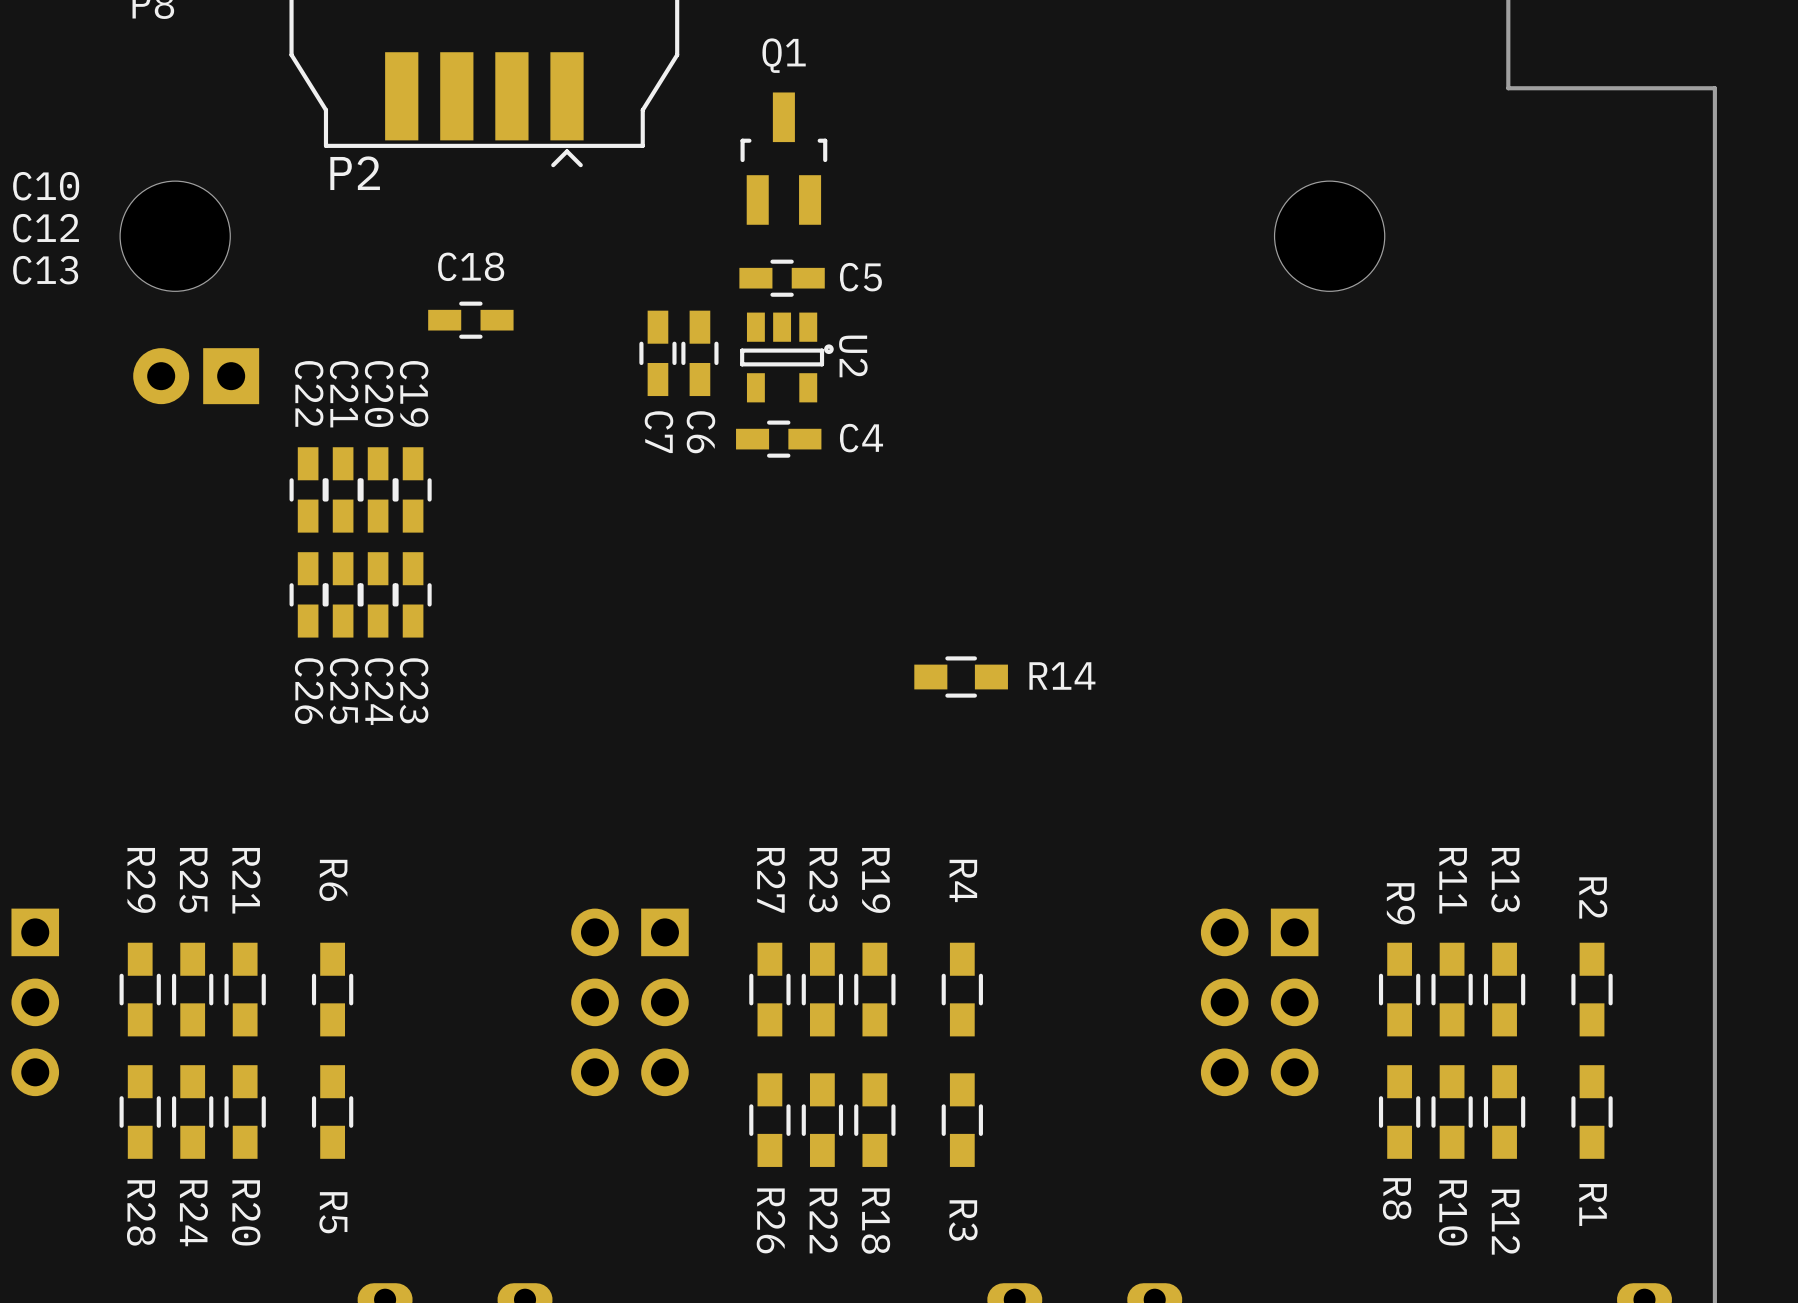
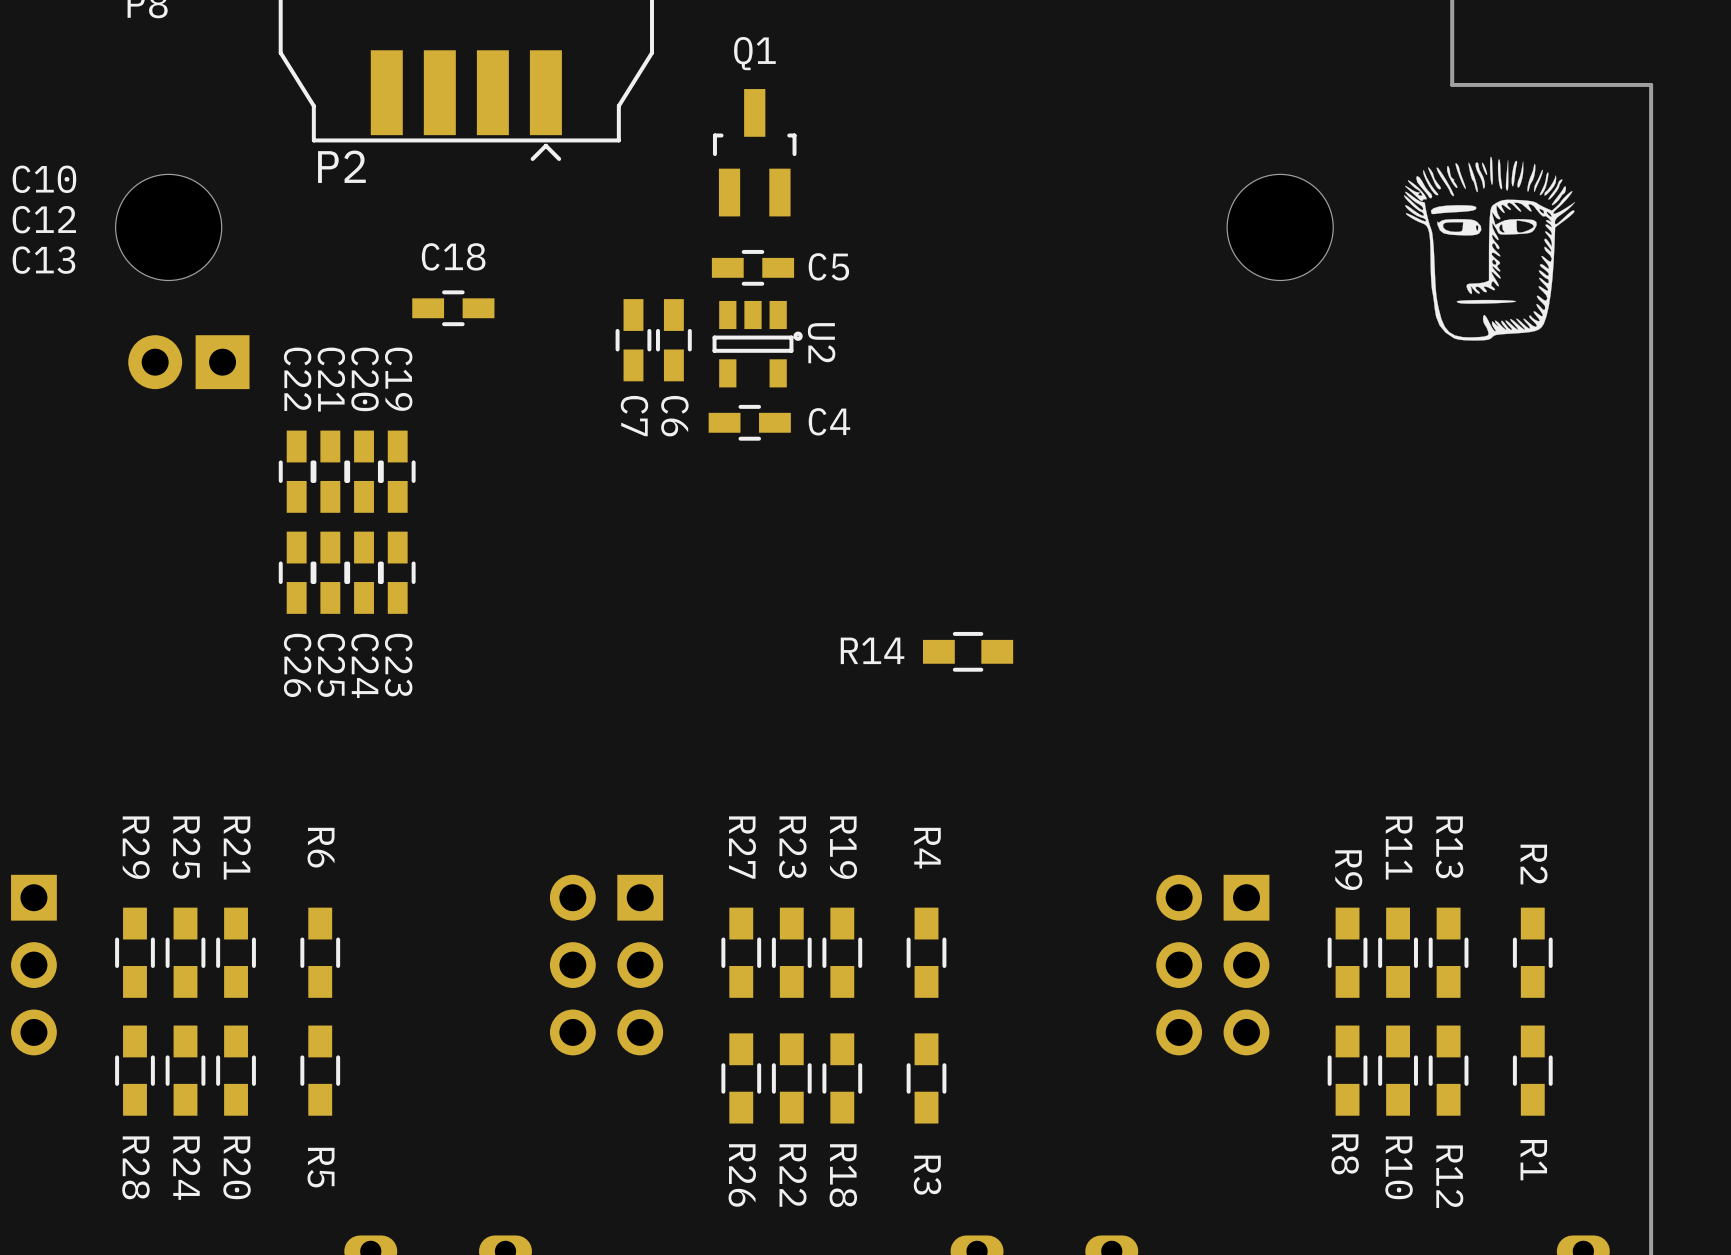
drawing: none -> [1403, 156, 1576, 341]
R14 name position: R14 (1062, 675) -> R14 (872, 650)
R14 position: (961, 677) -> (968, 651)

